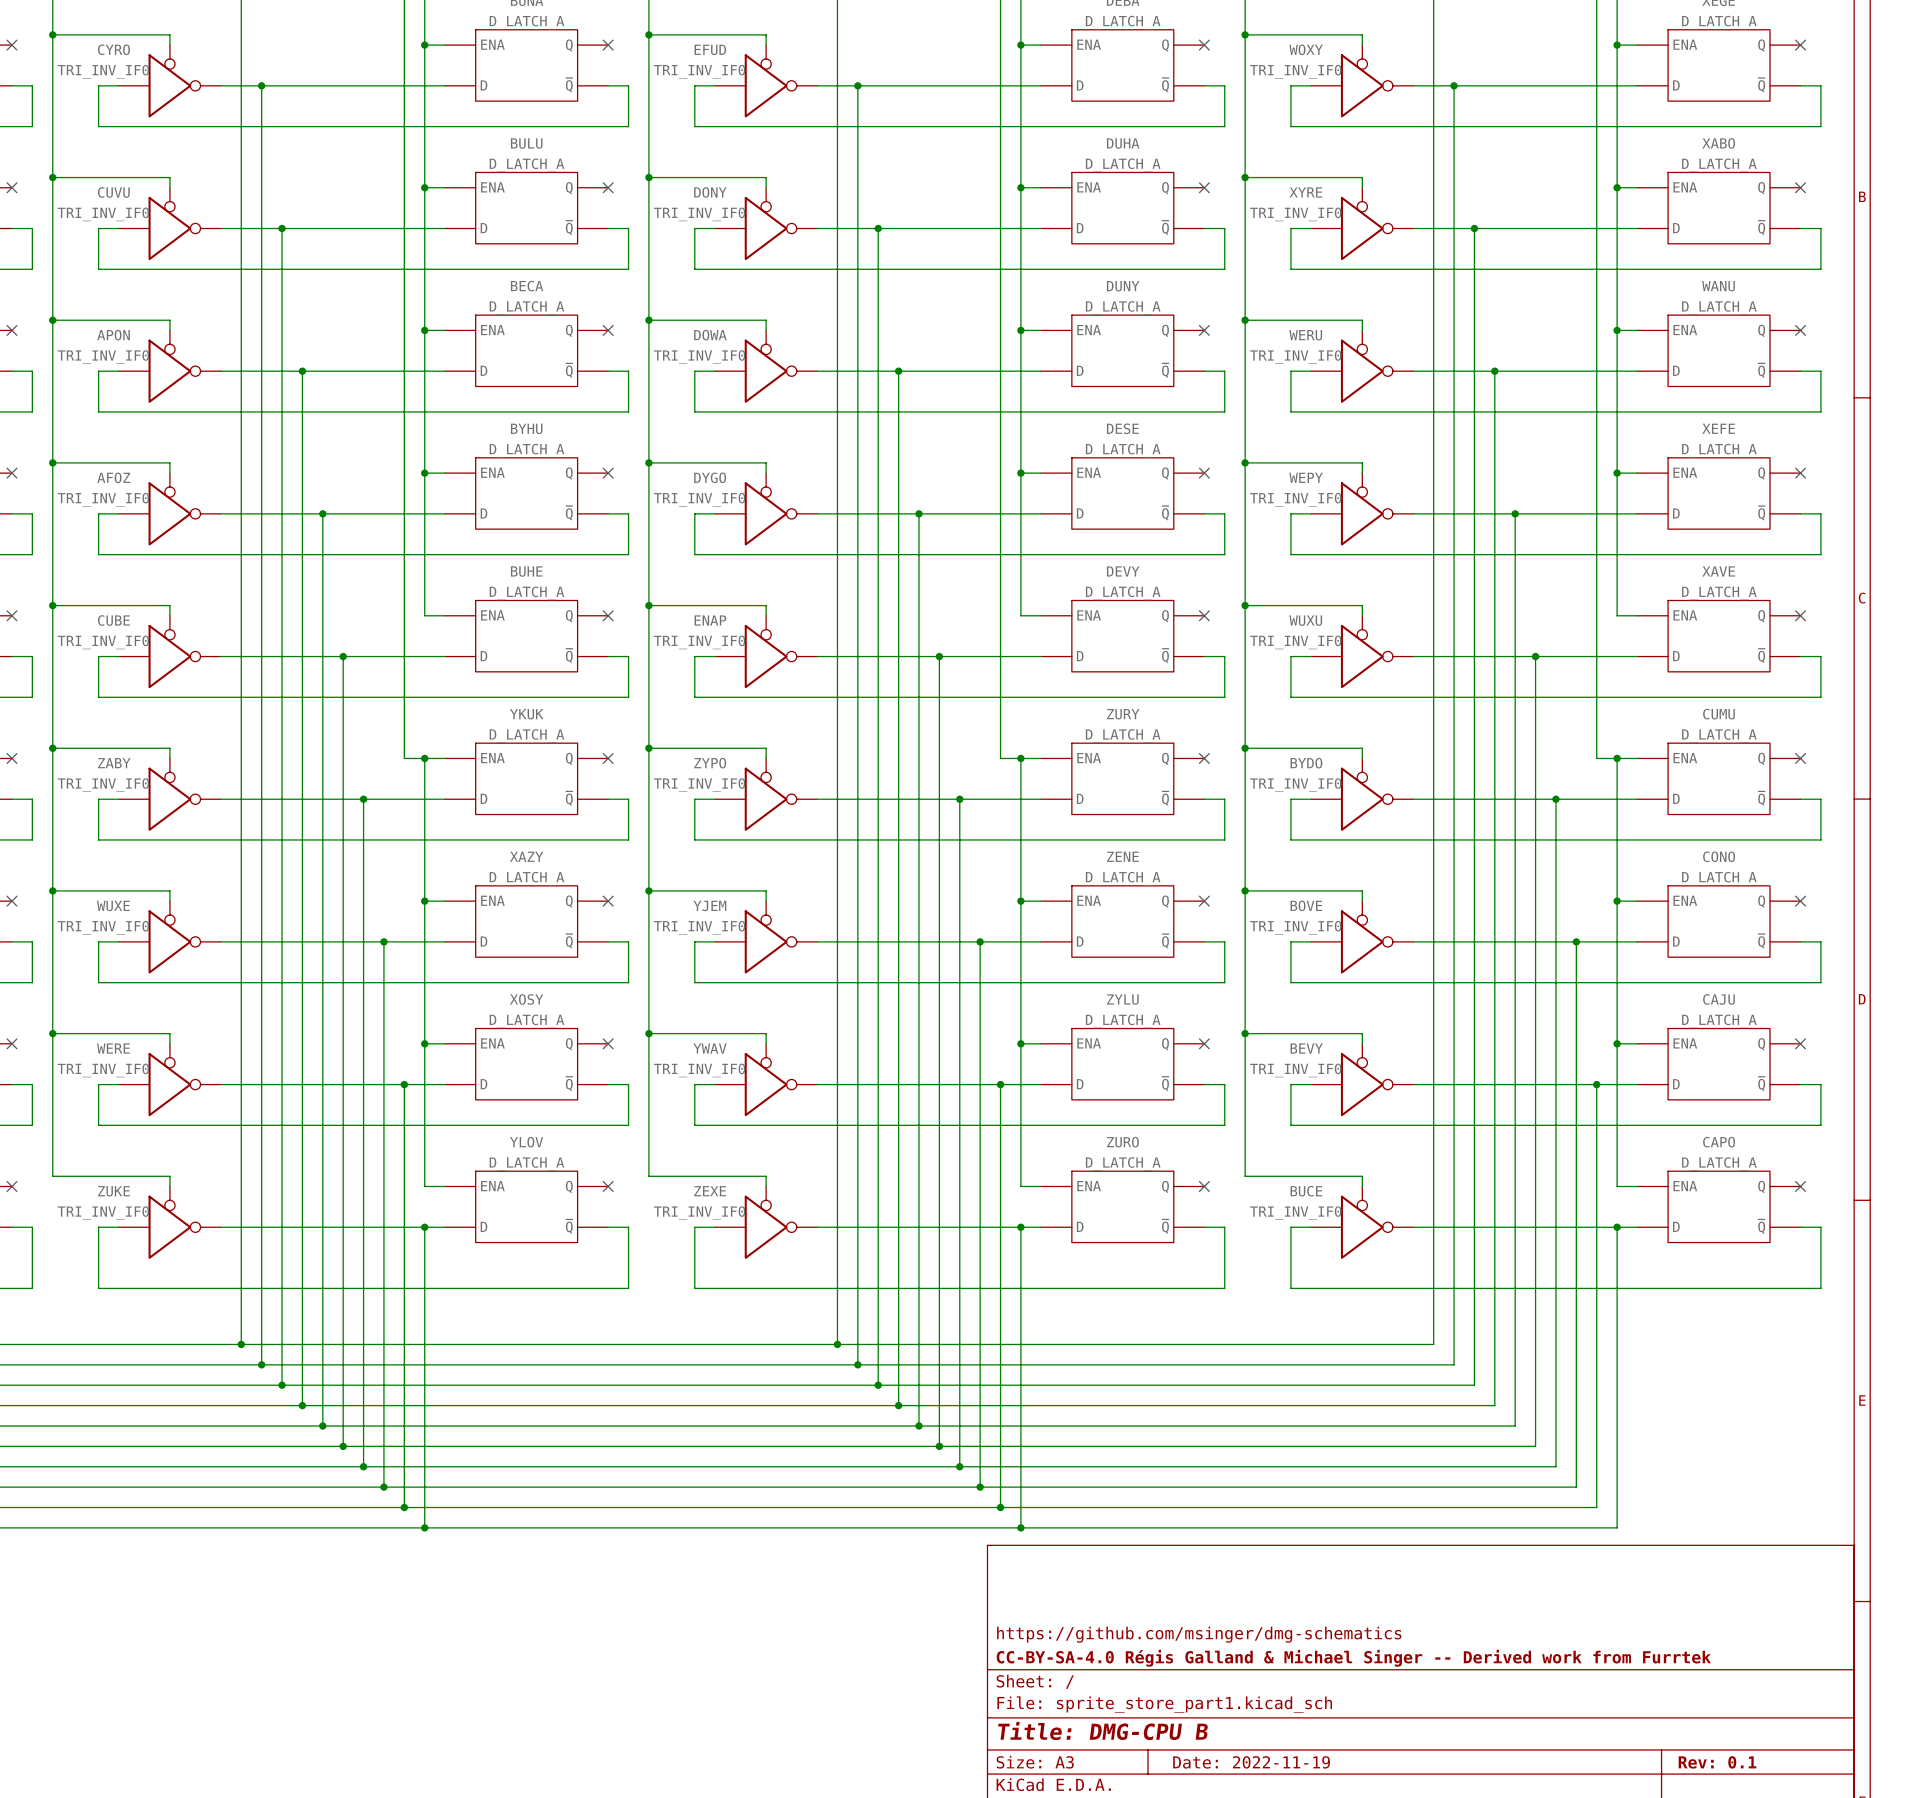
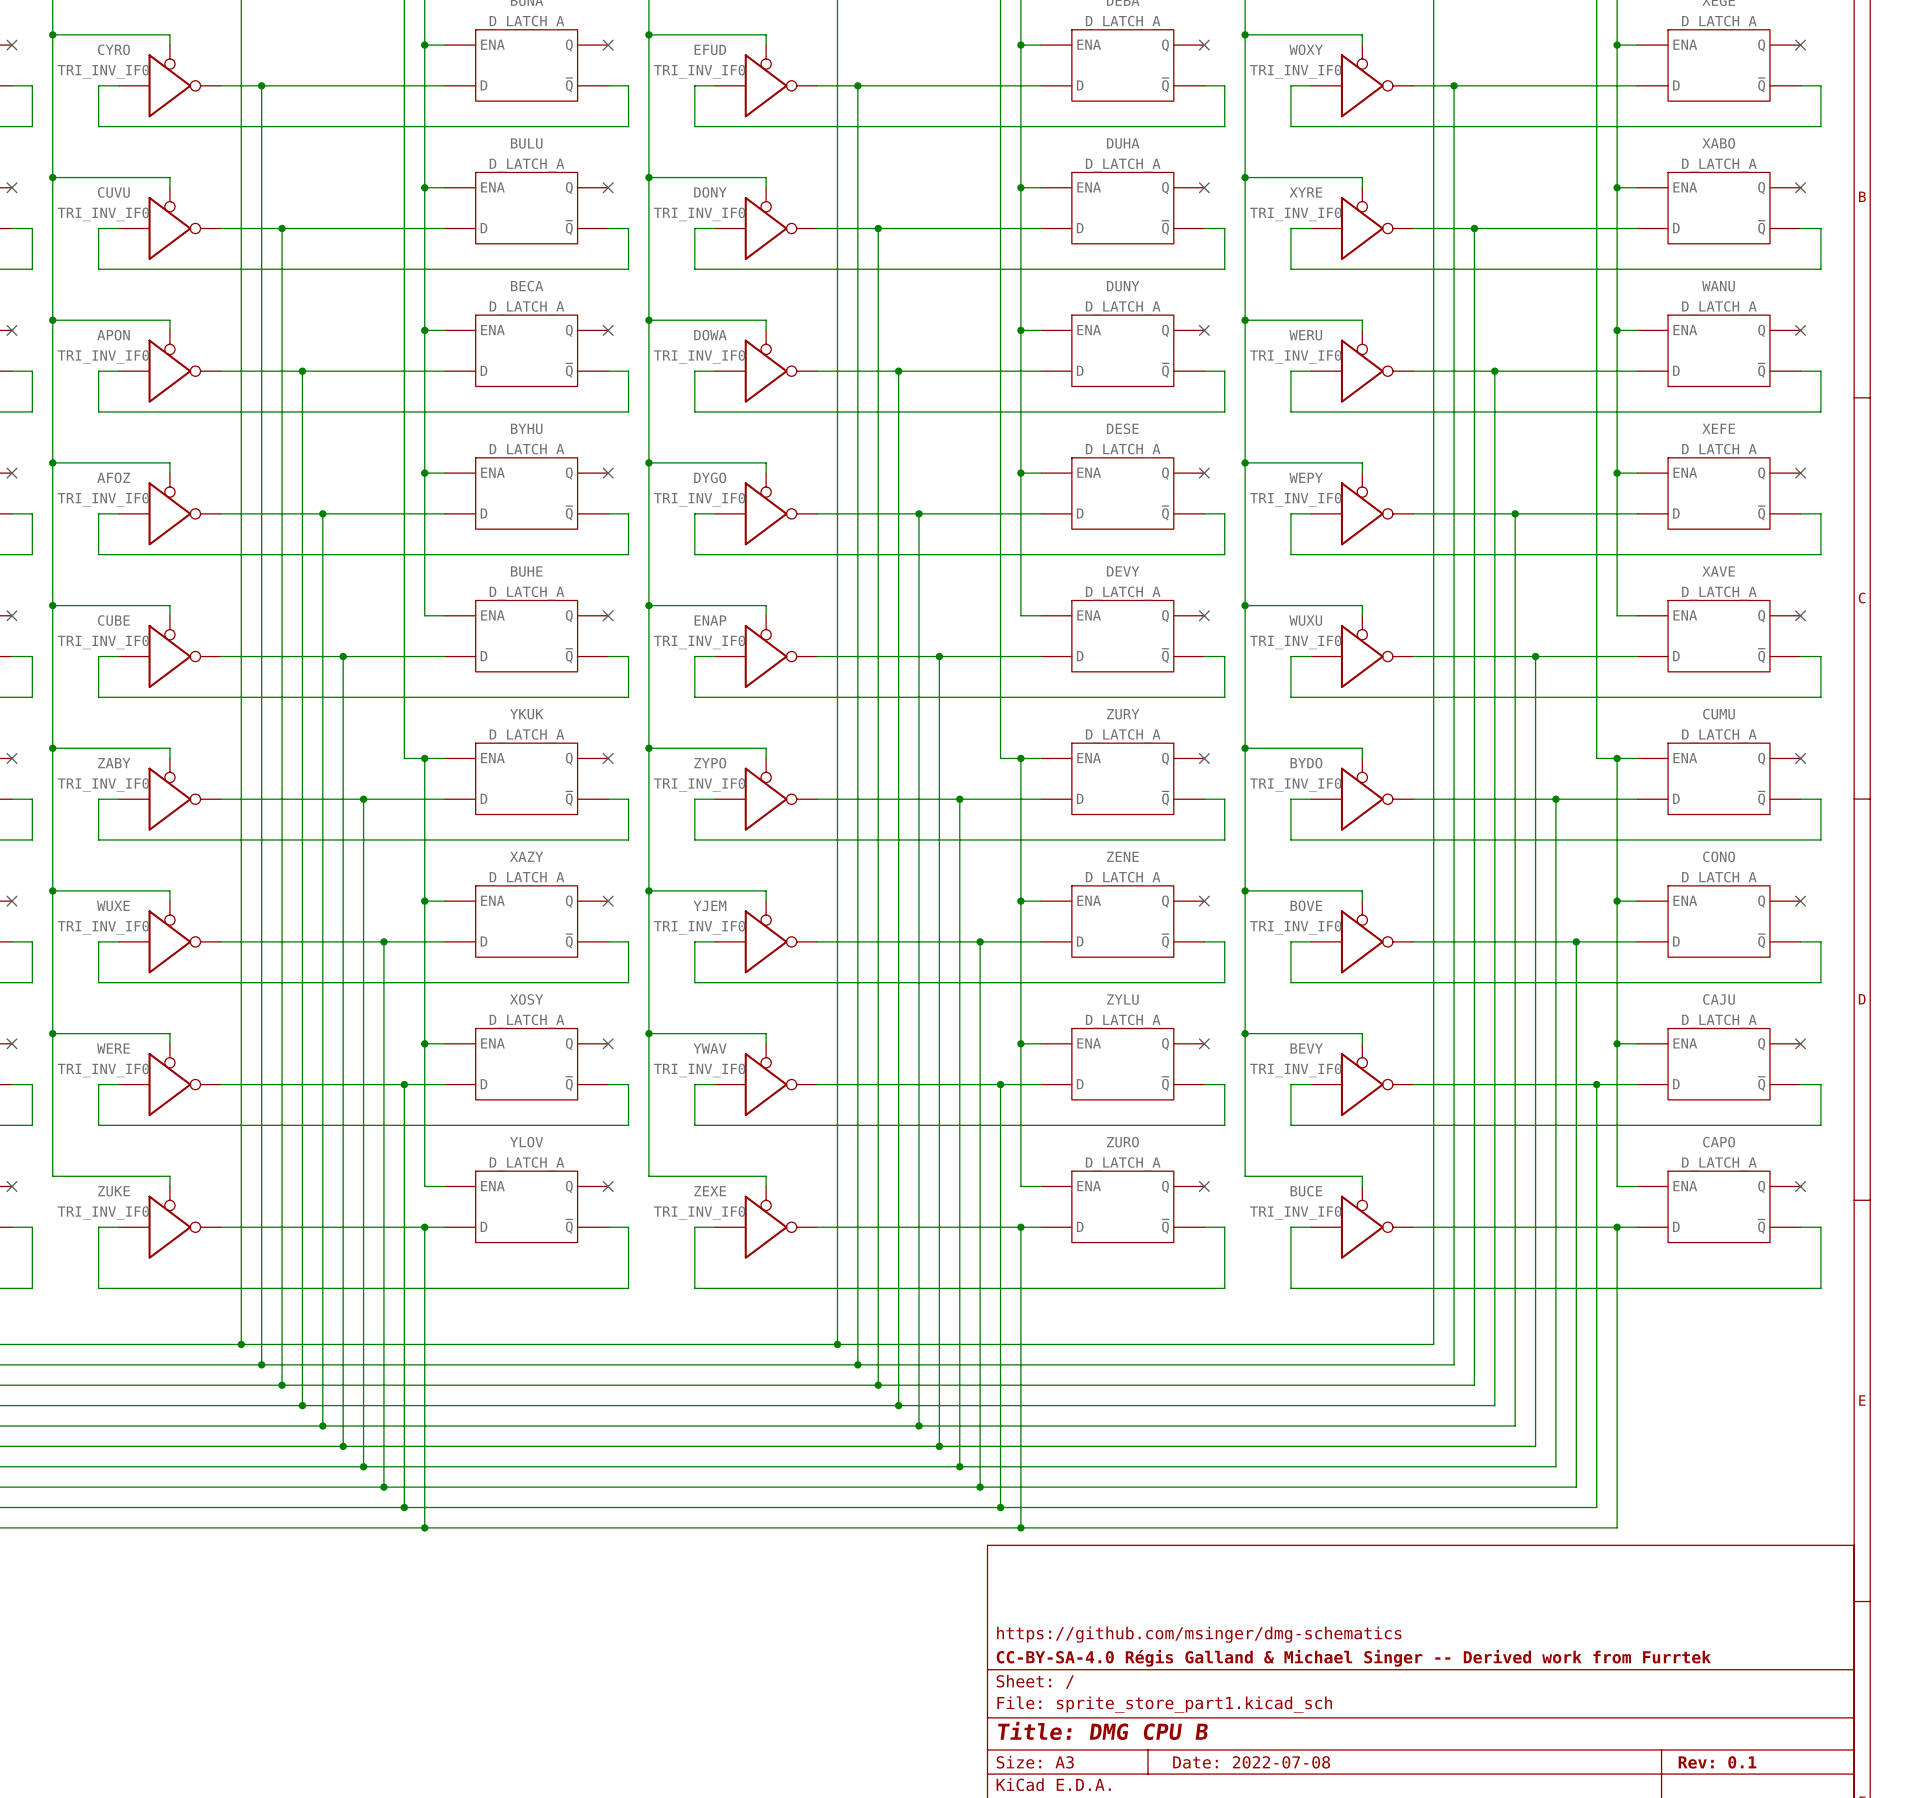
title block: Title: DMG-CPU B (1103, 1730) -> Title: DMG CPU B (1103, 1730)
title block: Date: 2022-11-19 (1251, 1762) -> Date: 2022-07-08 (1251, 1762)

